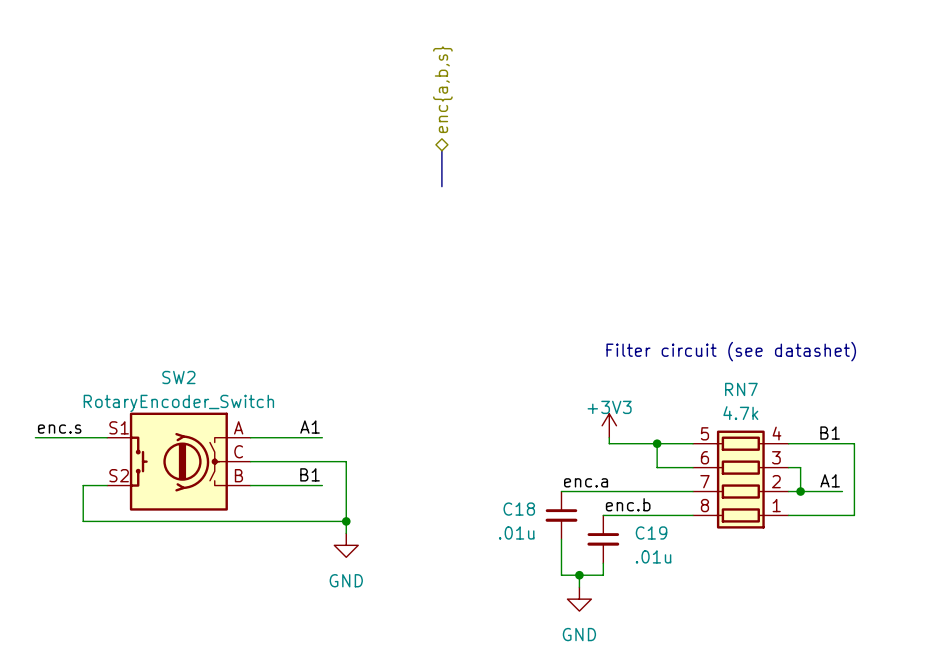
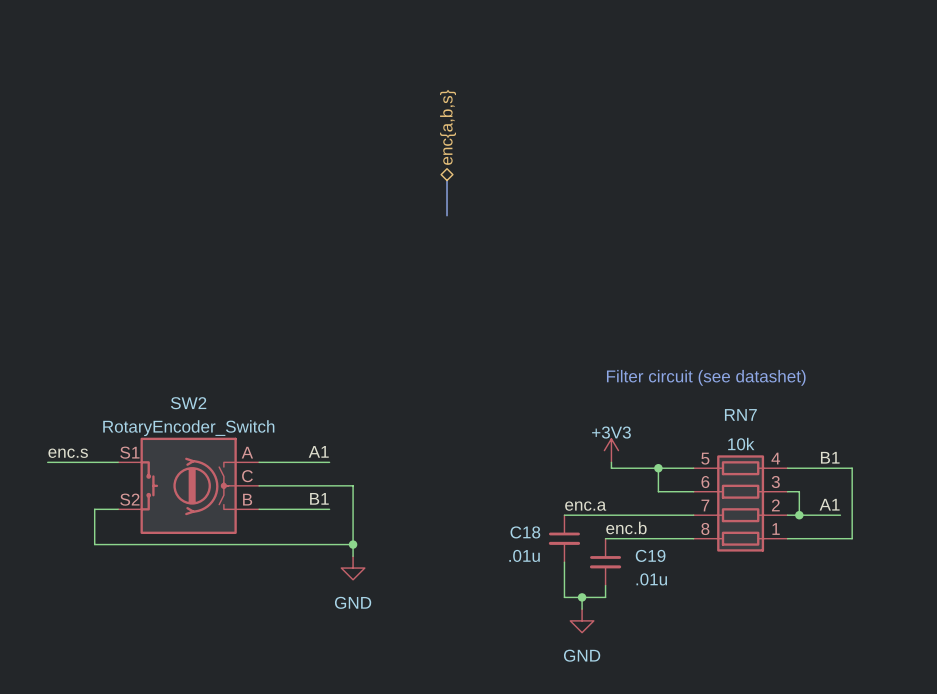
RN7 value: 4.7k (740, 413) -> 10k (741, 444)

